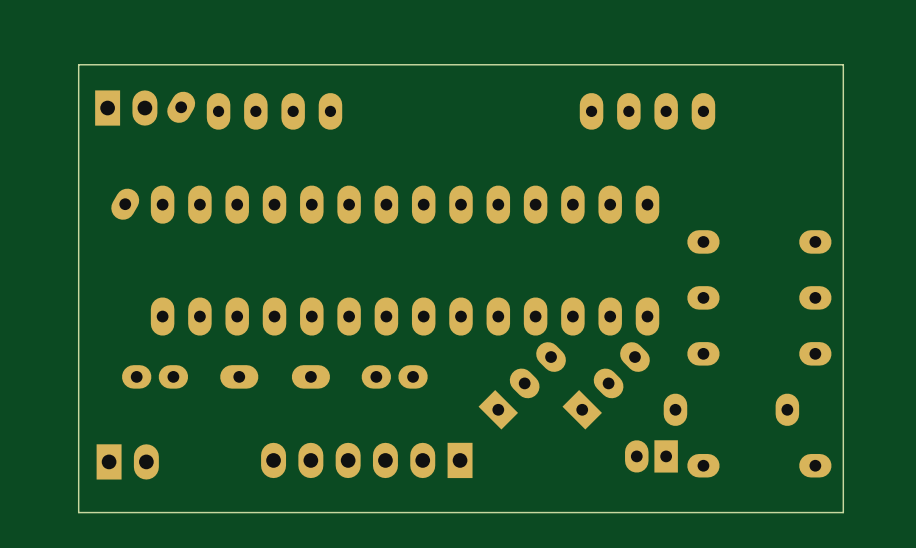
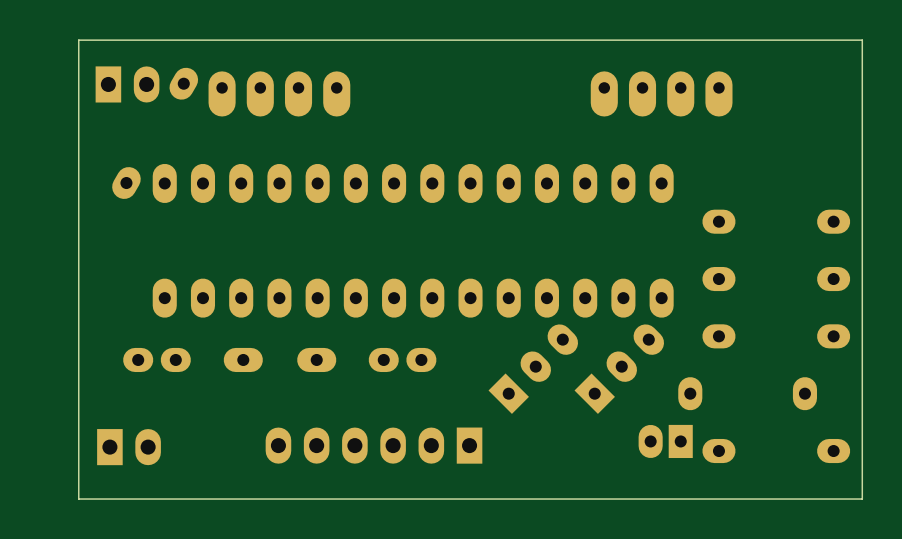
part footprint: [206, 93, 343, 130] -> [208, 71, 351, 117]
part footprint: [579, 93, 716, 130] -> [590, 71, 733, 117]

